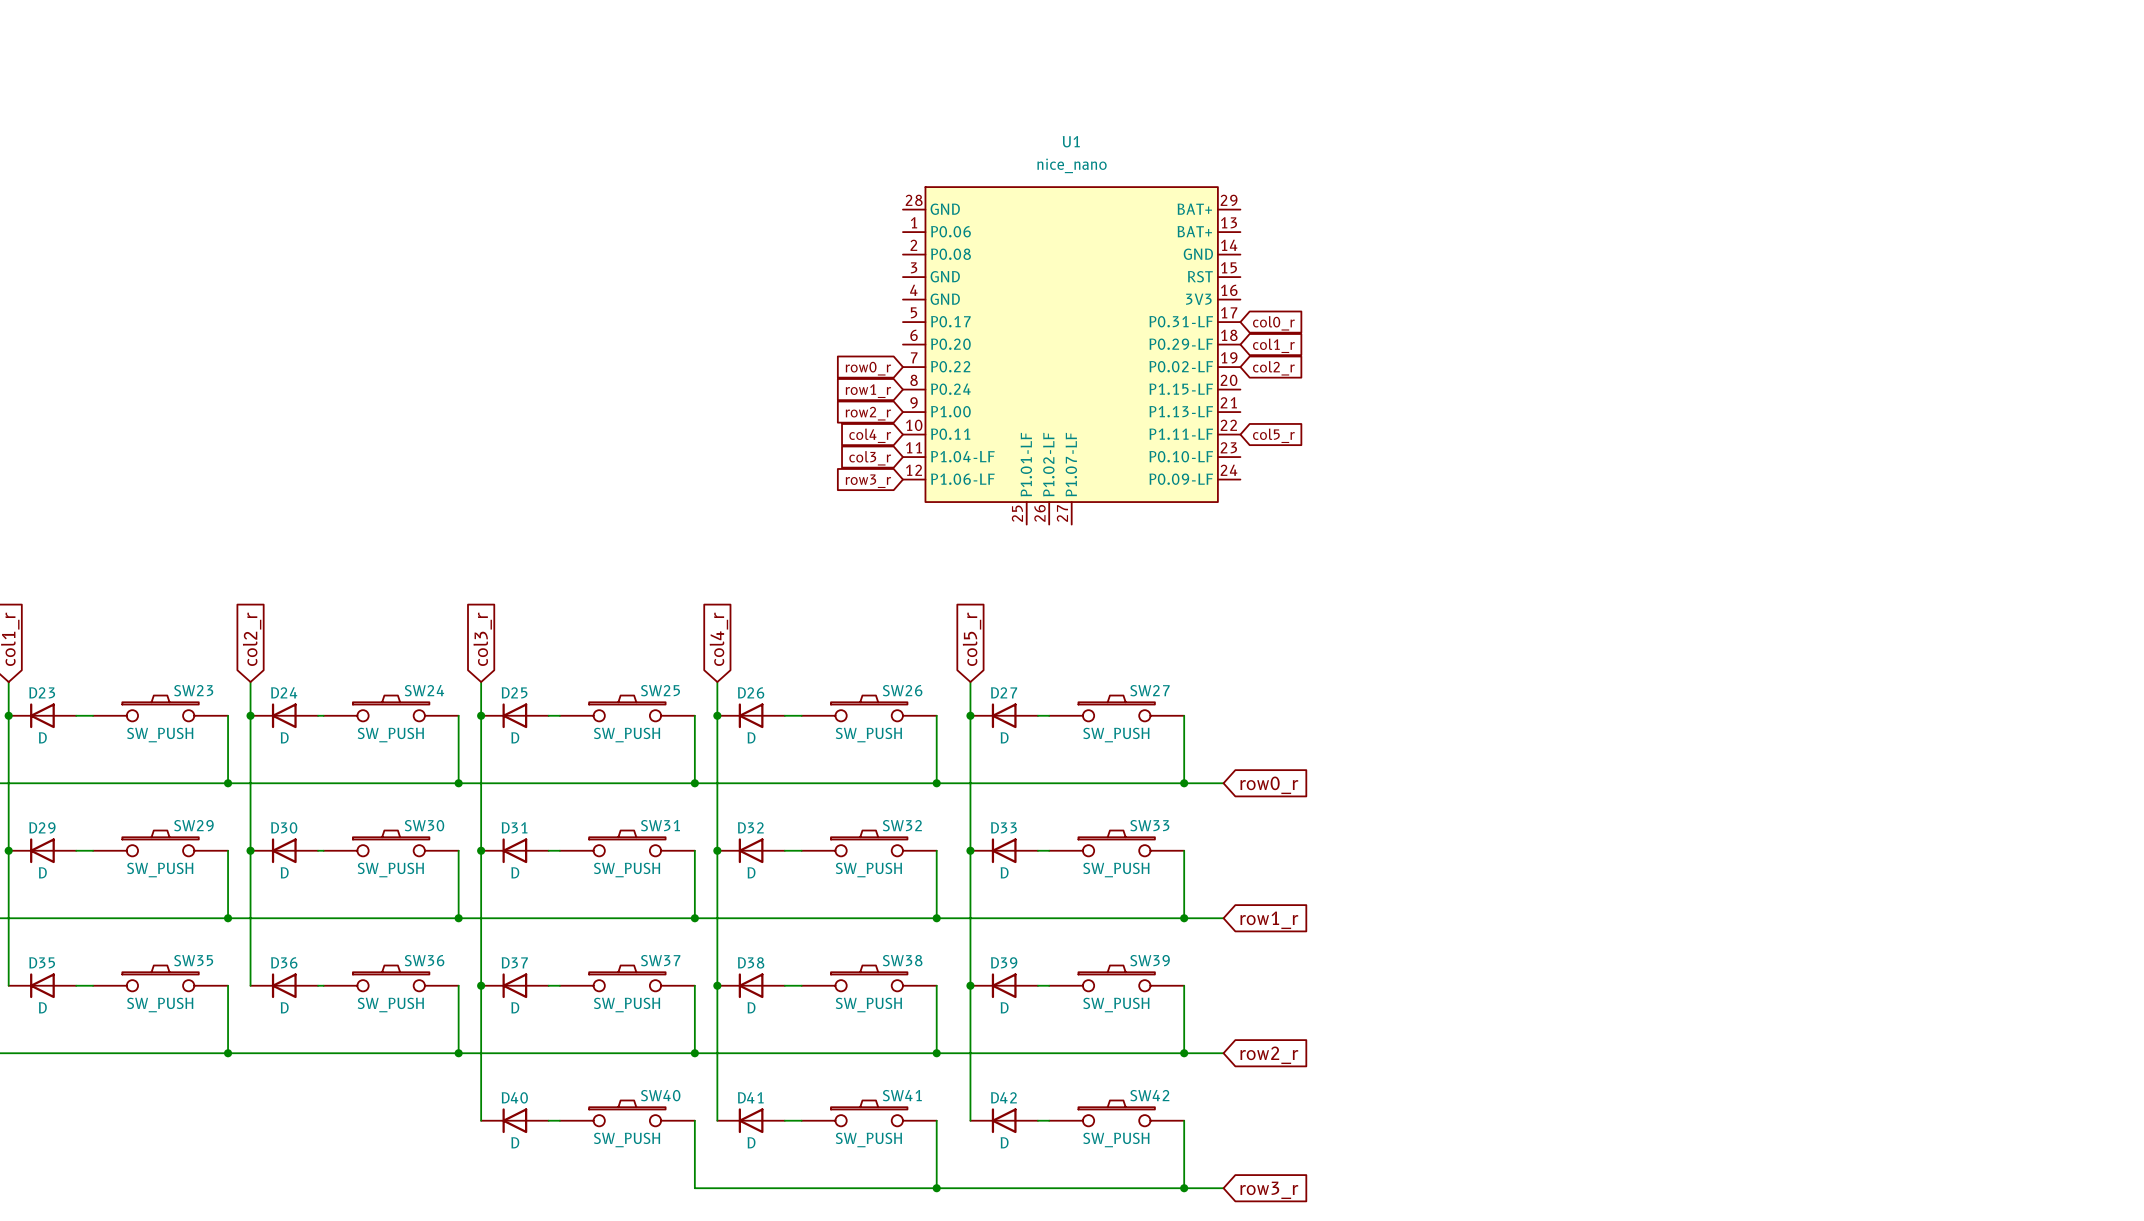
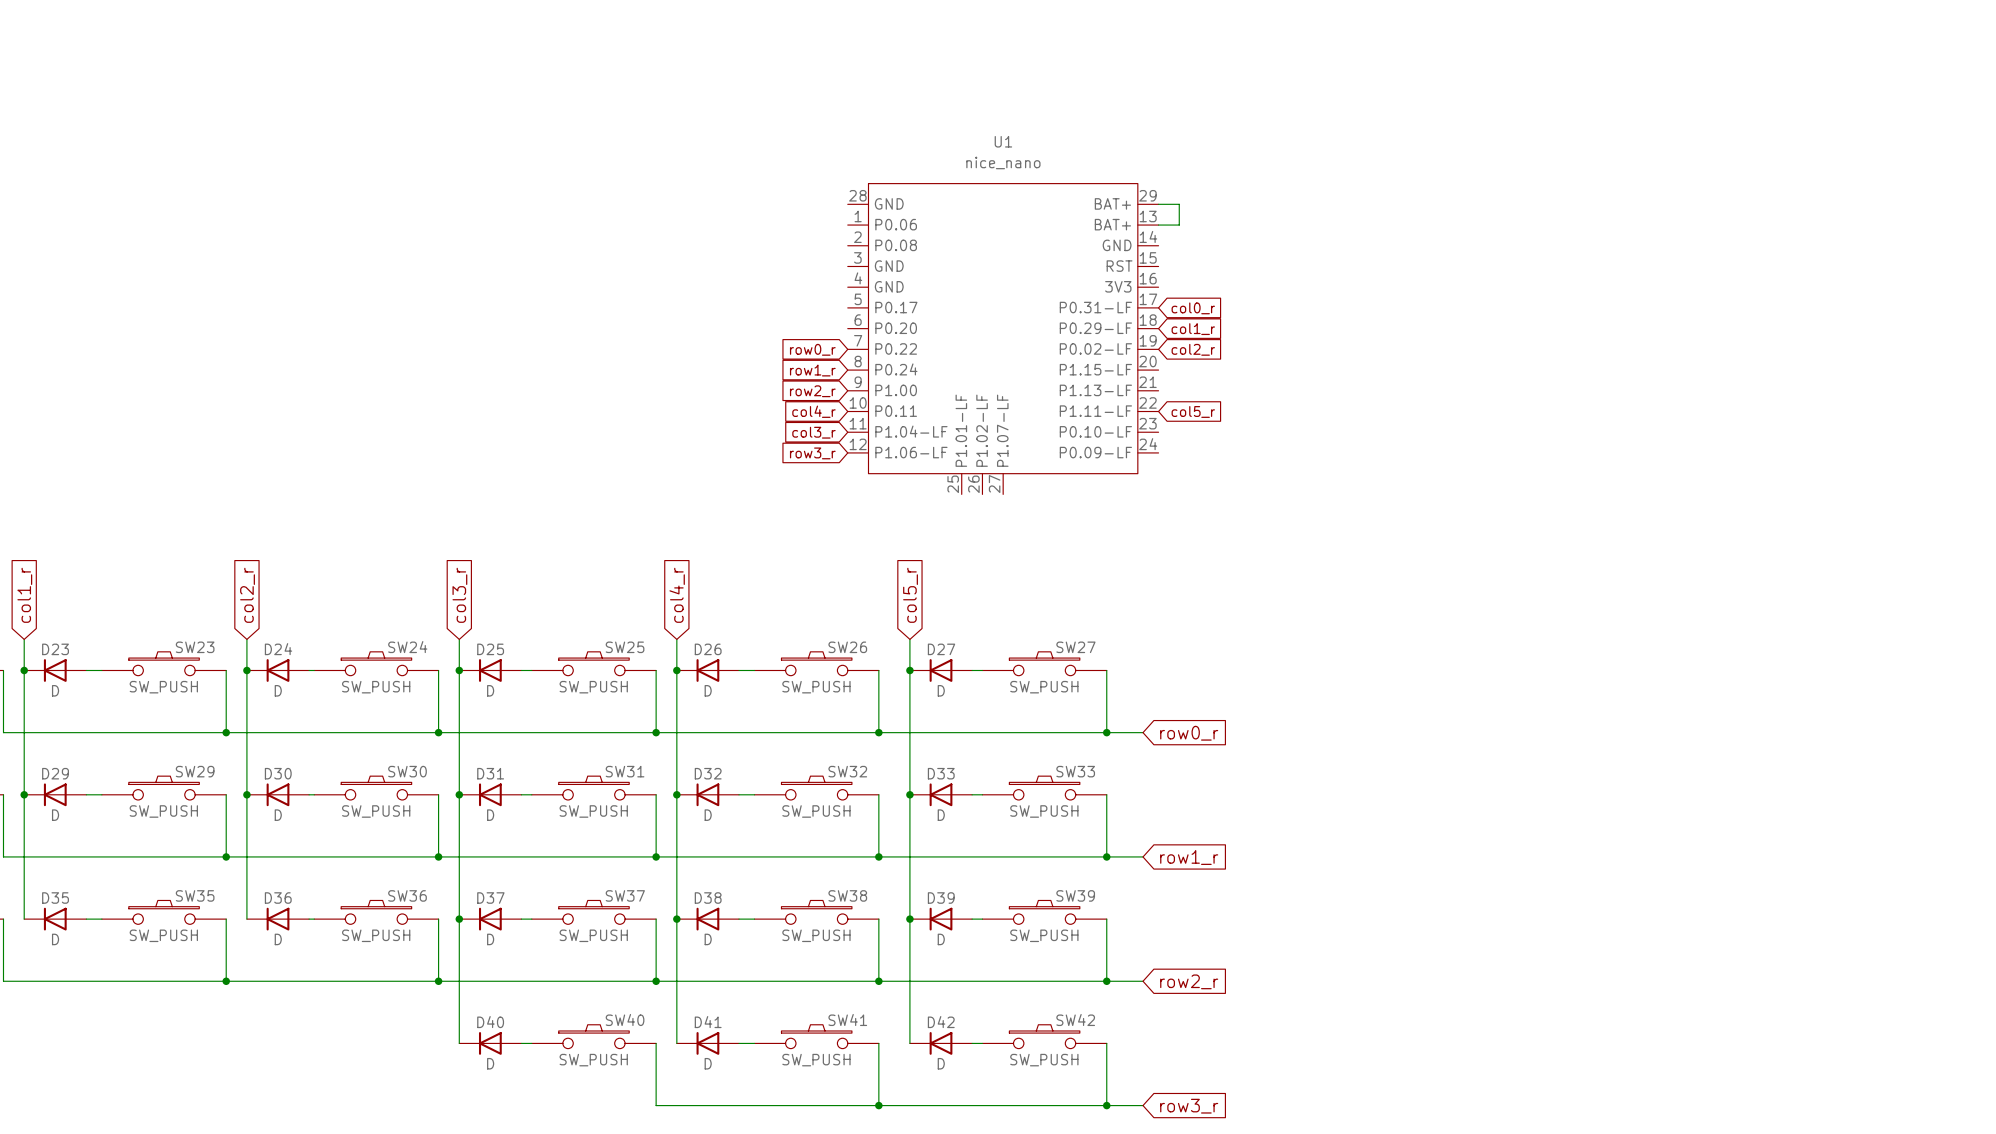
wire: none -> (1158, 204) (1179, 204) (1179, 225) (1158, 225)

